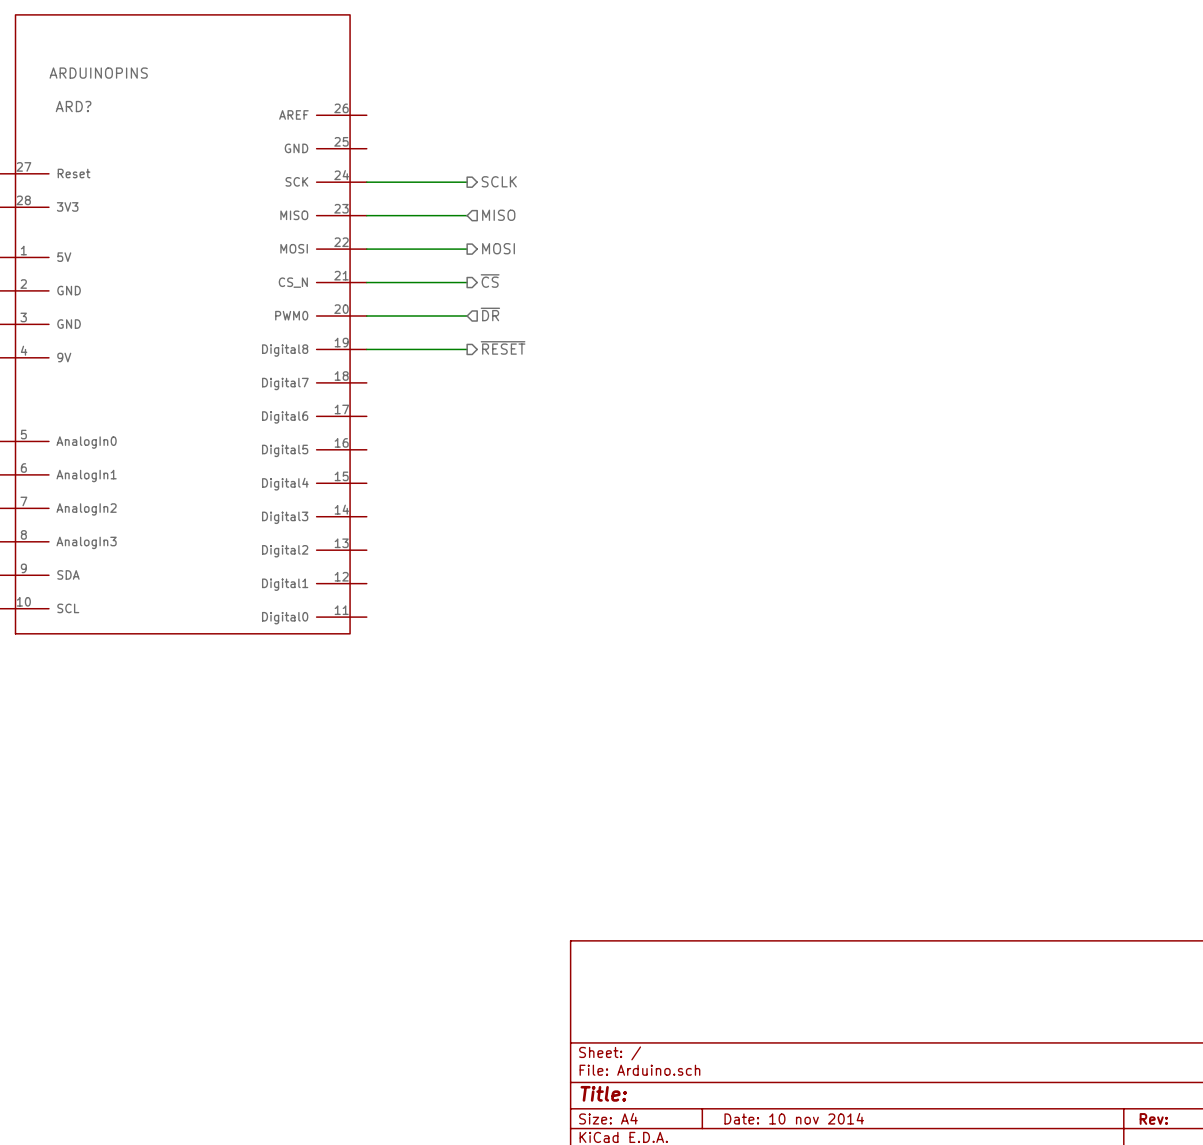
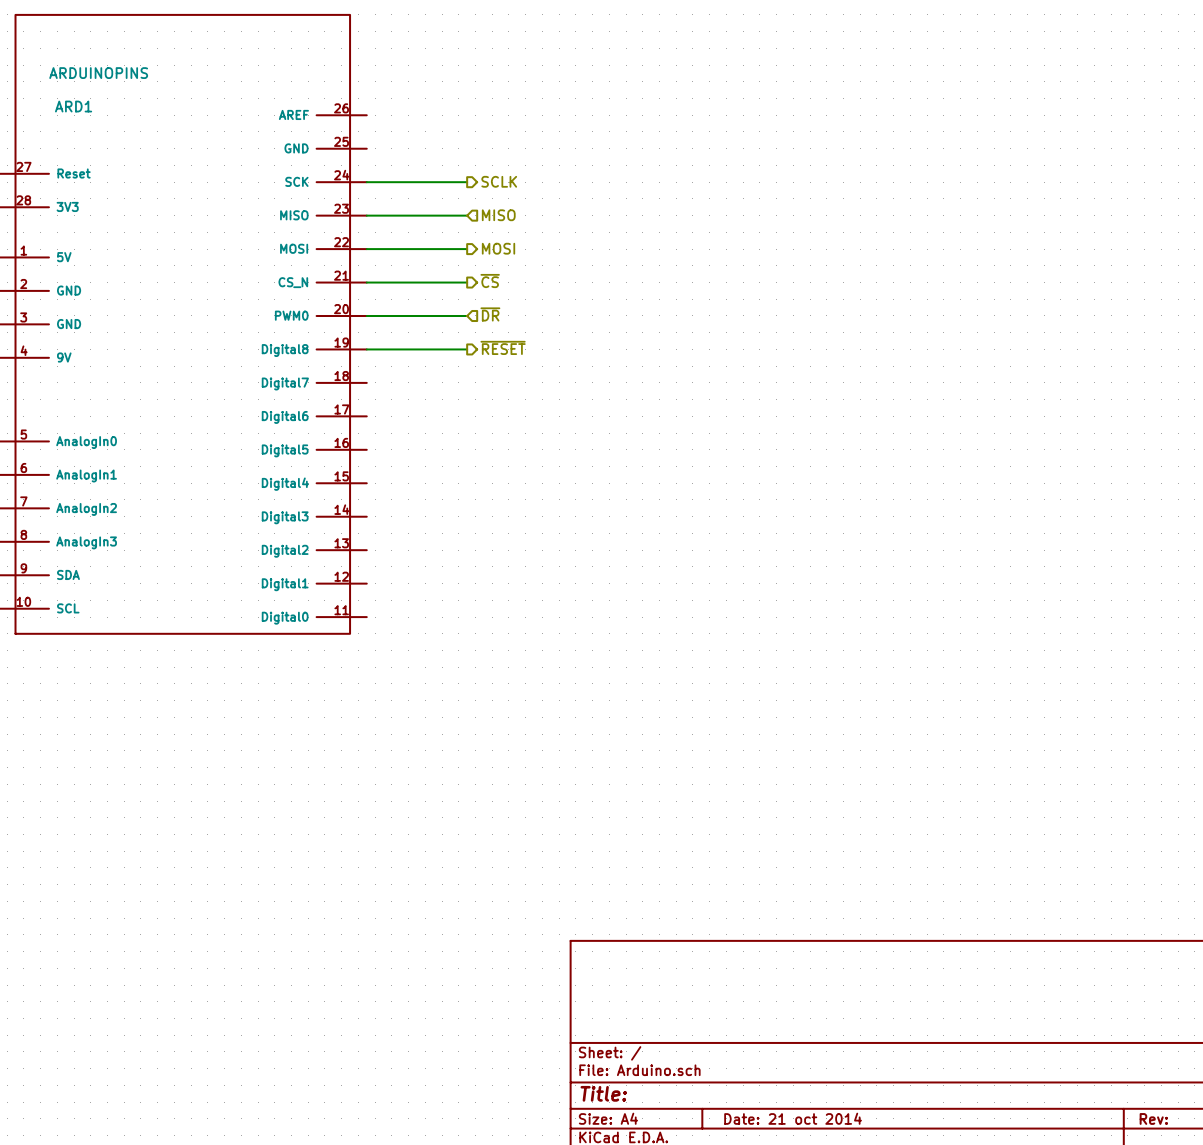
ARD? name: ARD? (73, 106) -> ARD1 (73, 106)
title block: Date: 10 nov 2014 (794, 1118) -> Date: 21 oct 2014 (793, 1118)

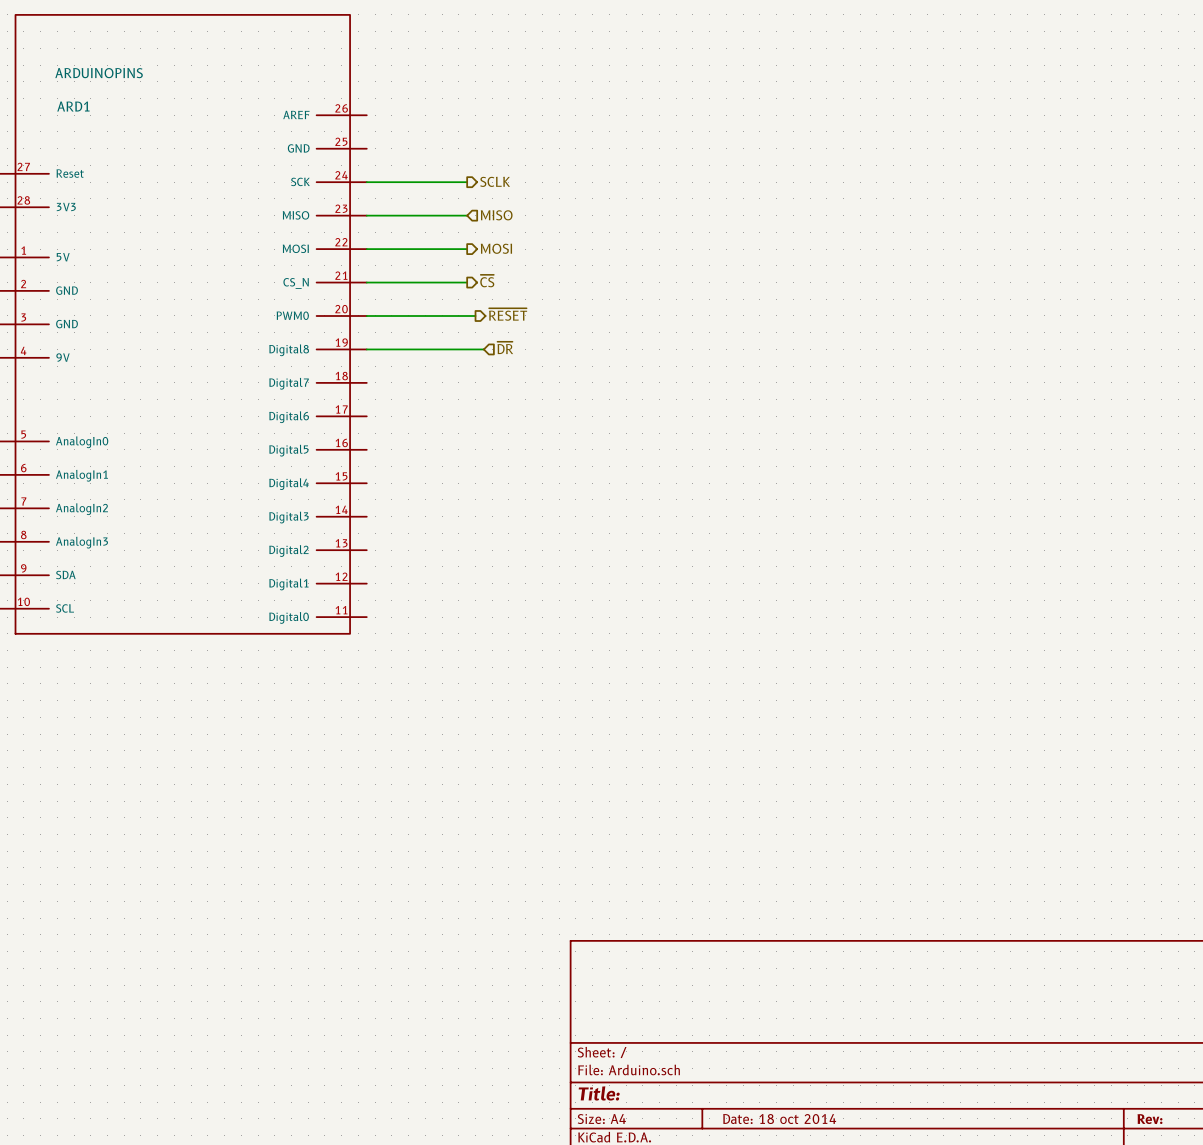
hierarchical label position: ~{DR} (490, 314) -> ~{DR} (505, 347)
wire: none -> (467, 315) (475, 315)
hierarchical label position: ~{RESET} (503, 347) -> ~{RESET} (508, 314)
wire: none -> (467, 349) (483, 349)
title block: Date: 21 oct 2014 (793, 1118) -> Date: 18 oct 2014 (779, 1119)

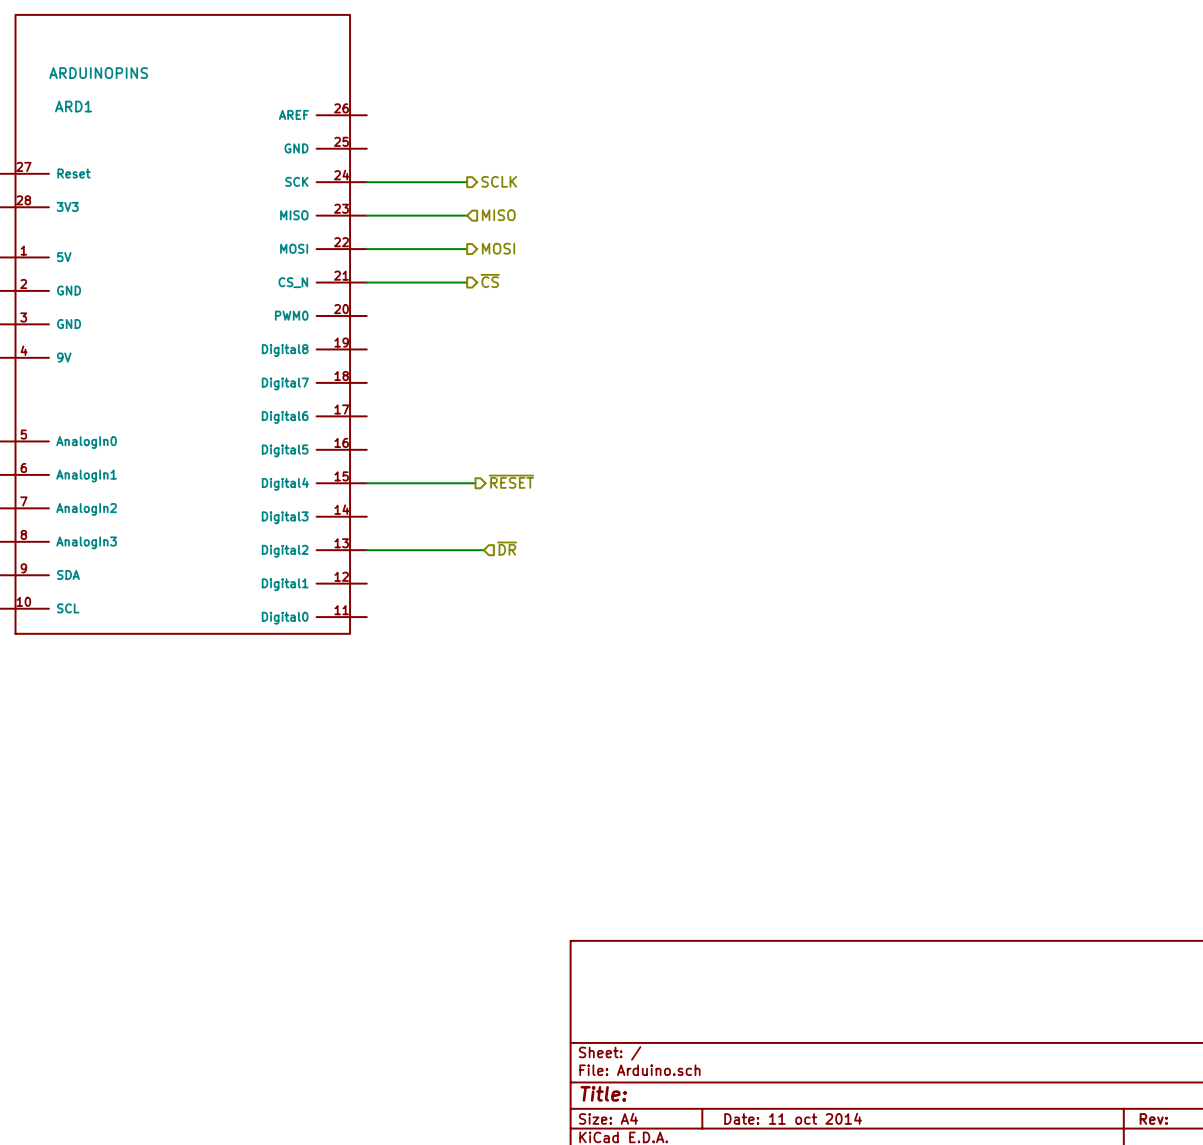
hierarchical label: ~{RESET} (508, 314) -> none
wire: (366, 315) (475, 315) -> none
hierarchical label: ~{DR} (505, 347) -> none
wire: (366, 349) (483, 349) -> none
hierarchical label: none -> ~{RESET} (511, 481)
wire: none -> (366, 483) (475, 483)
hierarchical label: none -> ~{DR} (507, 548)
wire: none -> (366, 550) (483, 550)
title block: Date: 18 oct 2014 (779, 1119) -> Date: 11 oct 2014 (793, 1118)

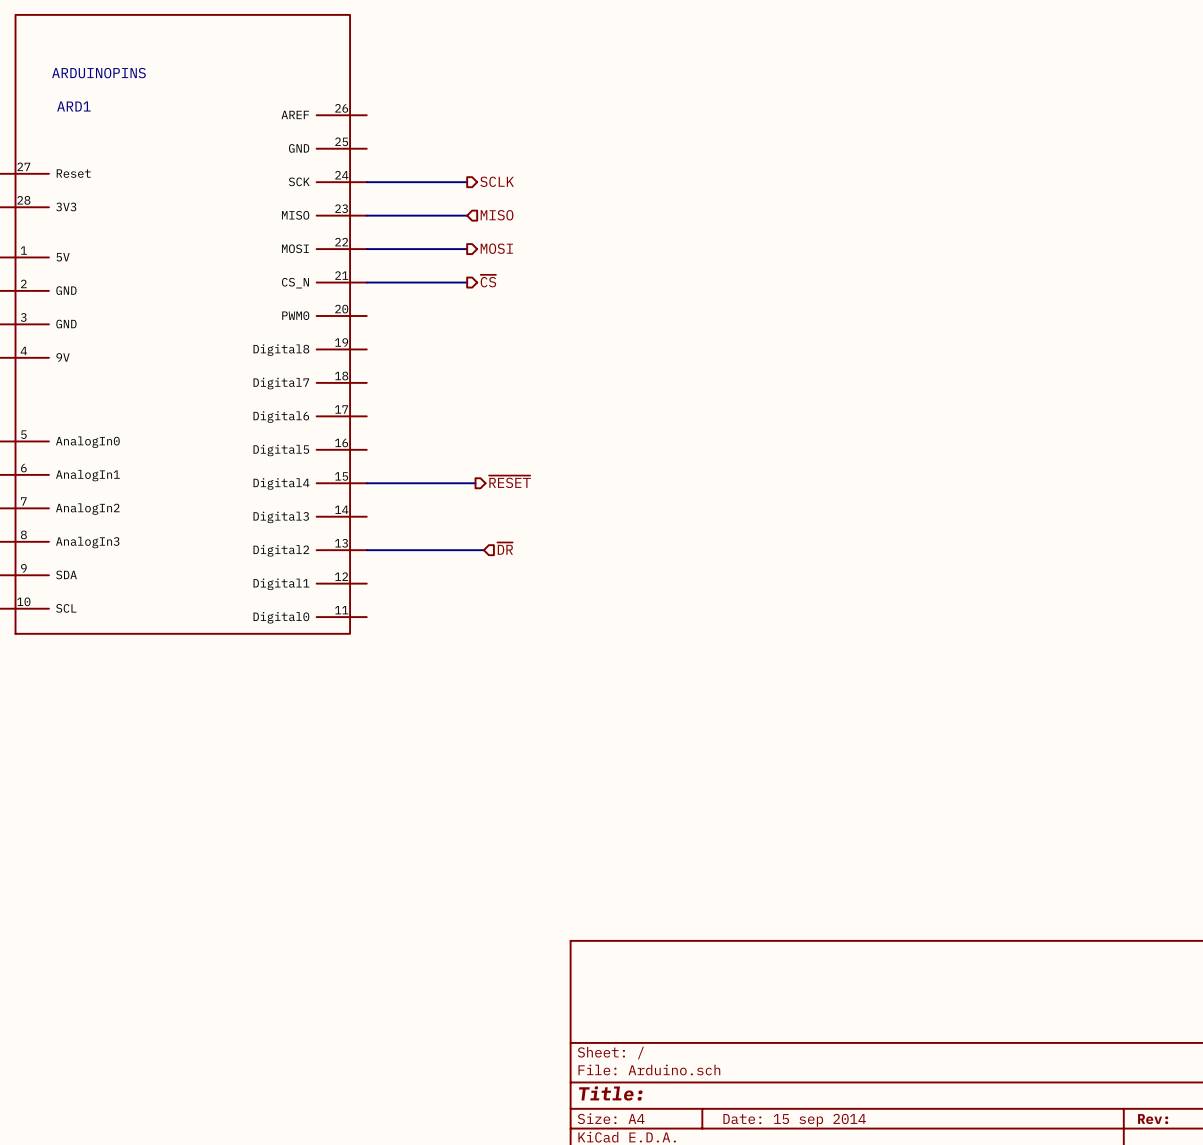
title block: Date: 11 oct 2014 (793, 1118) -> Date: 15 sep 2014 (794, 1120)

